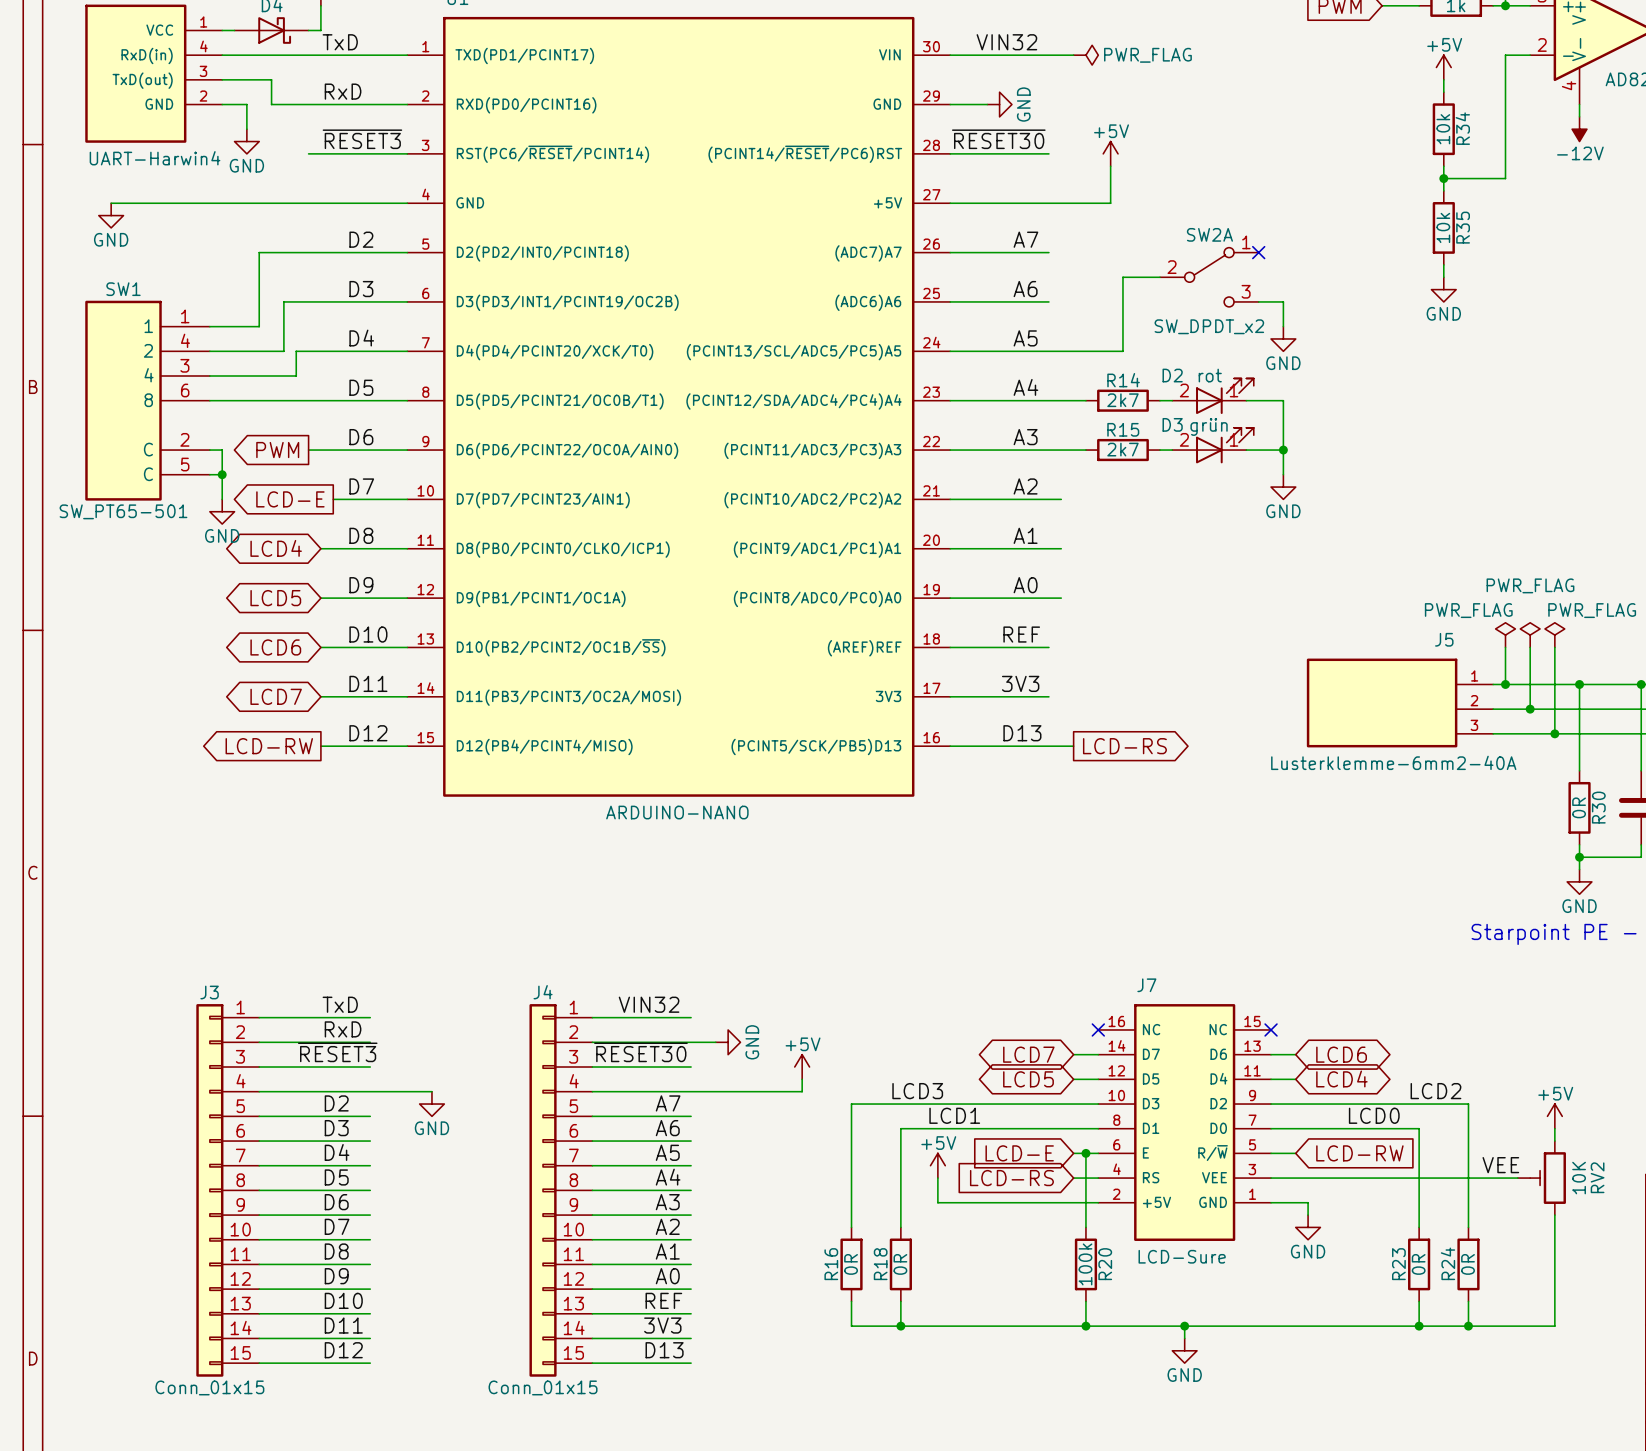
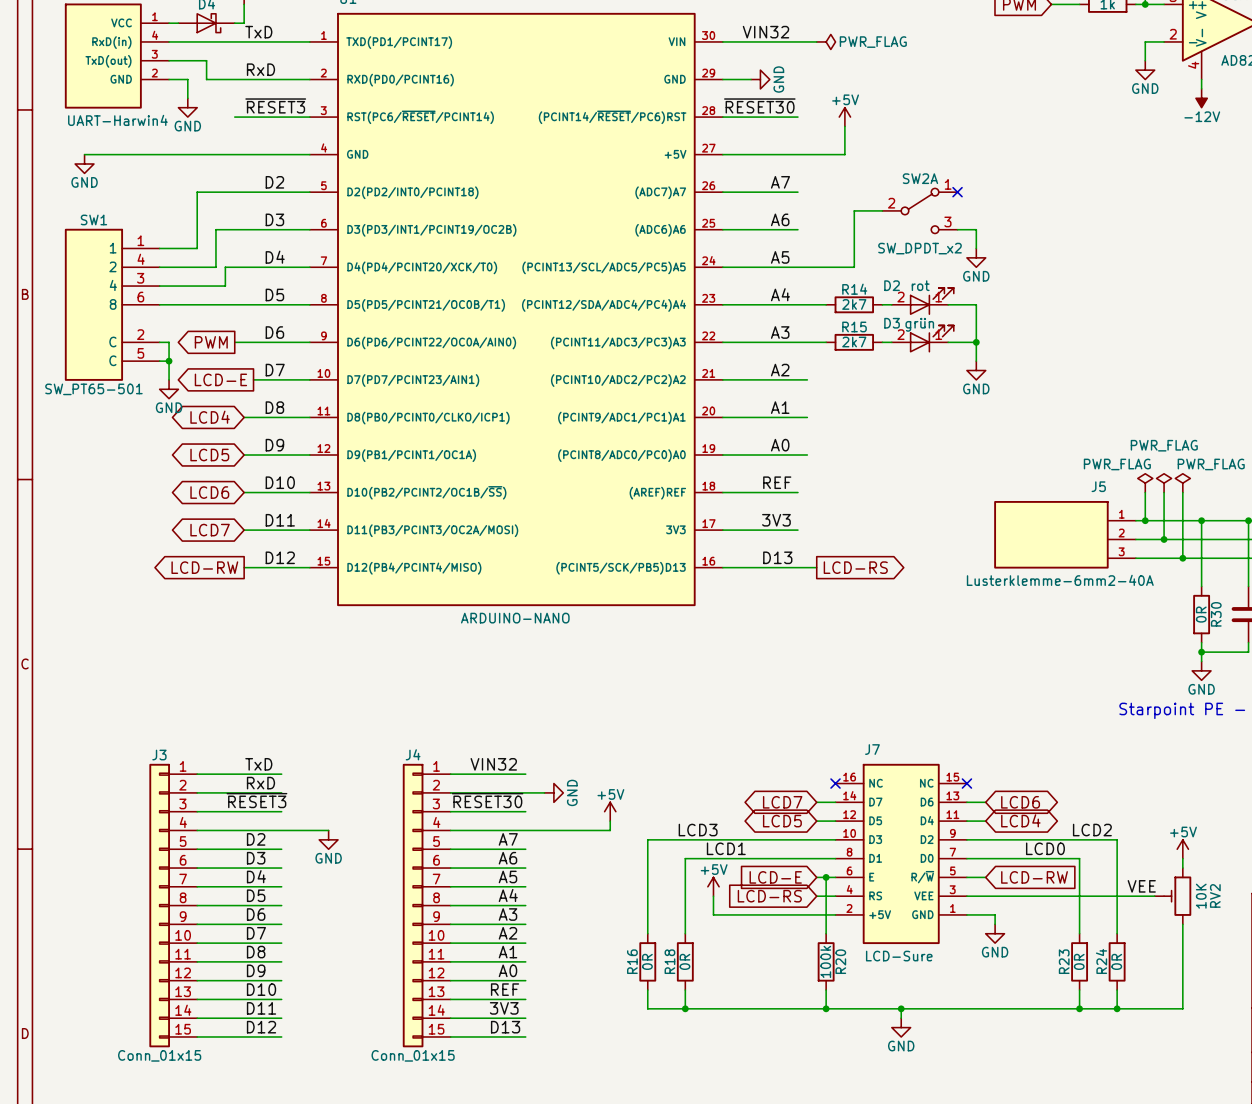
power symbol: +5V (1443, 67) -> none
wire: (1443, 79) (1443, 92) -> none
wire: (1505, 79) (1505, 178) (1443, 178) -> none
R34: 10k (1443, 129) -> none
wire: (1443, 166) (1443, 190) -> none
junction: (1443, 178) -> none
R35: 10k (1443, 227) -> none
wire: (1443, 264) (1443, 277) -> none
power symbol position: GND (1443, 289) -> GND (1145, 70)

